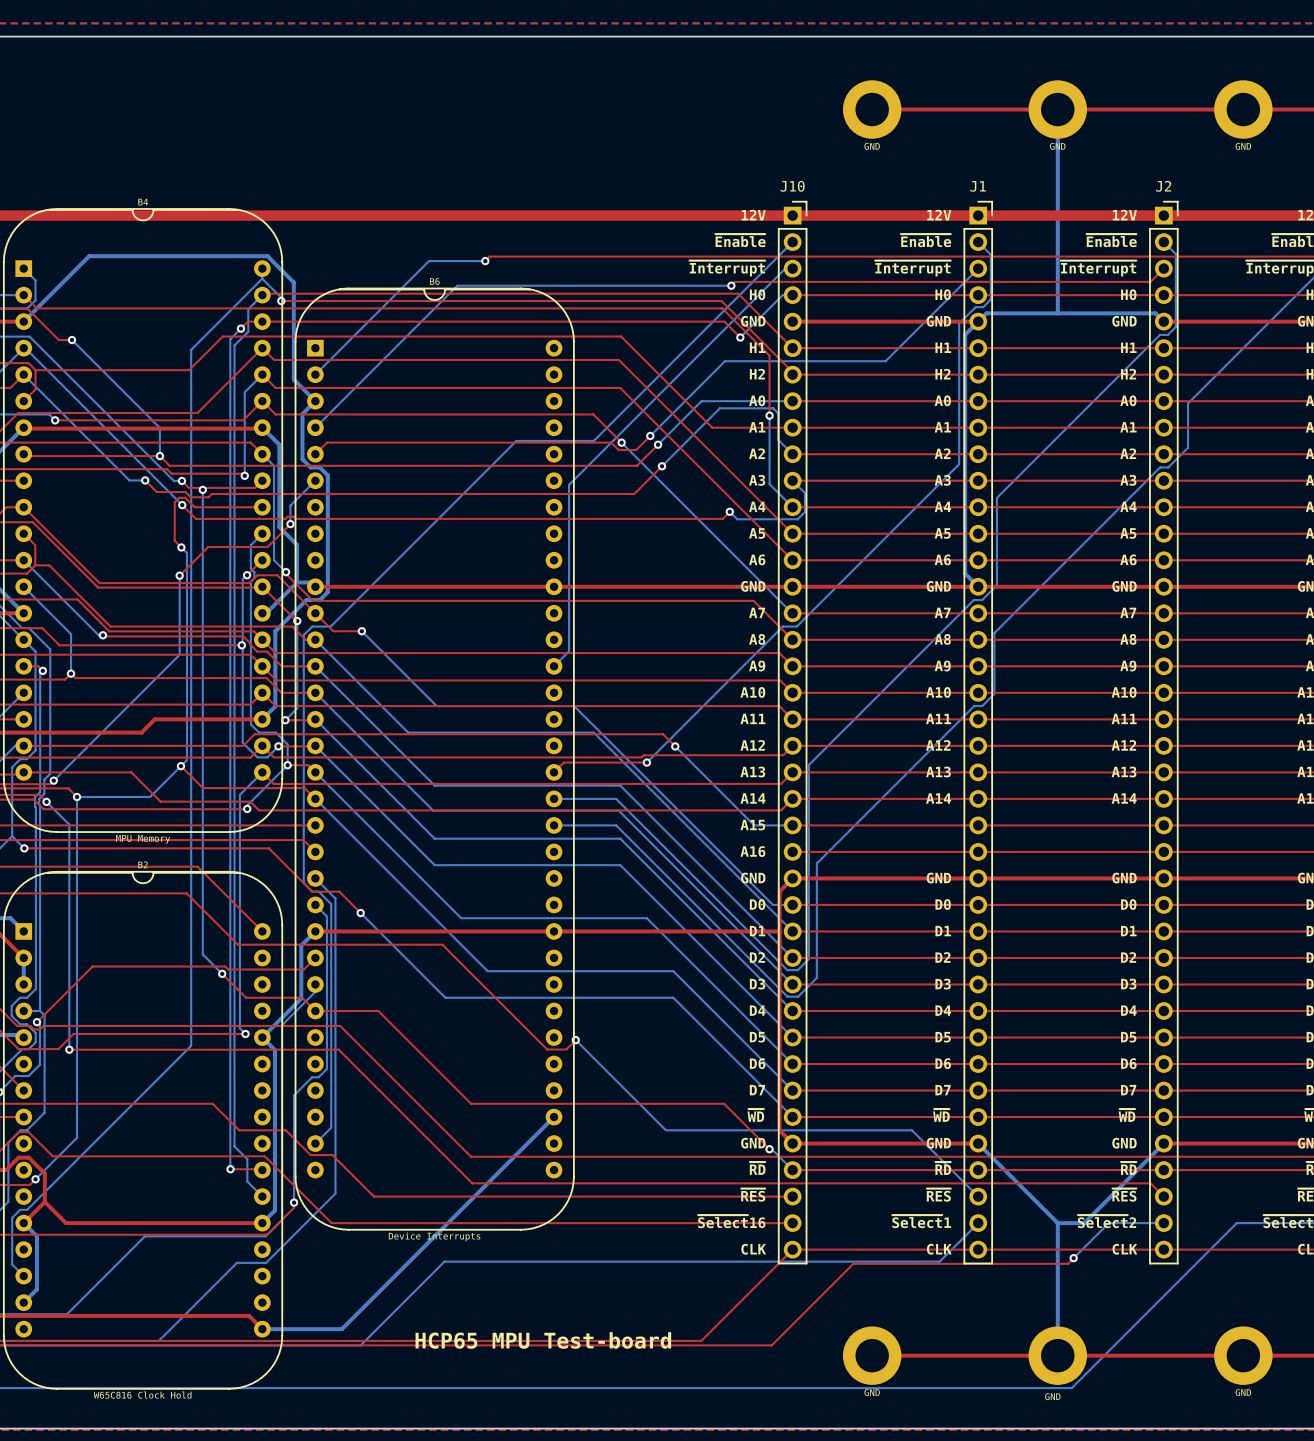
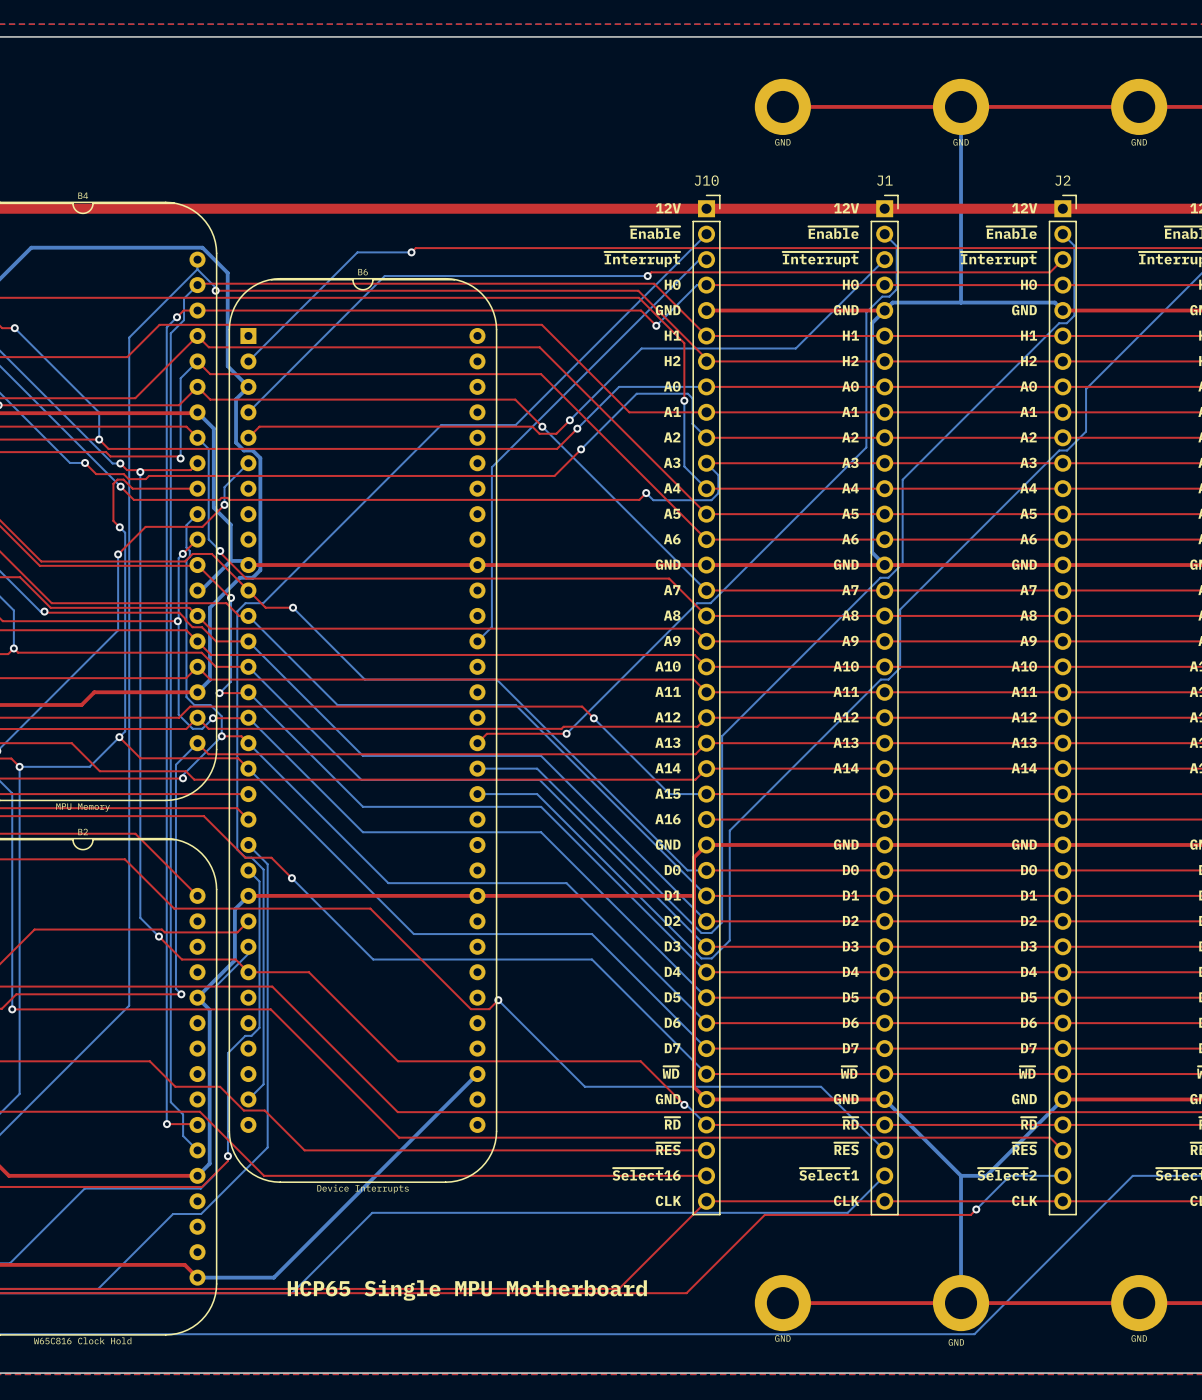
text: HCP65 MPU Test-board (543, 1340) -> HCP65 Single MPU Motherboard (467, 1290)

